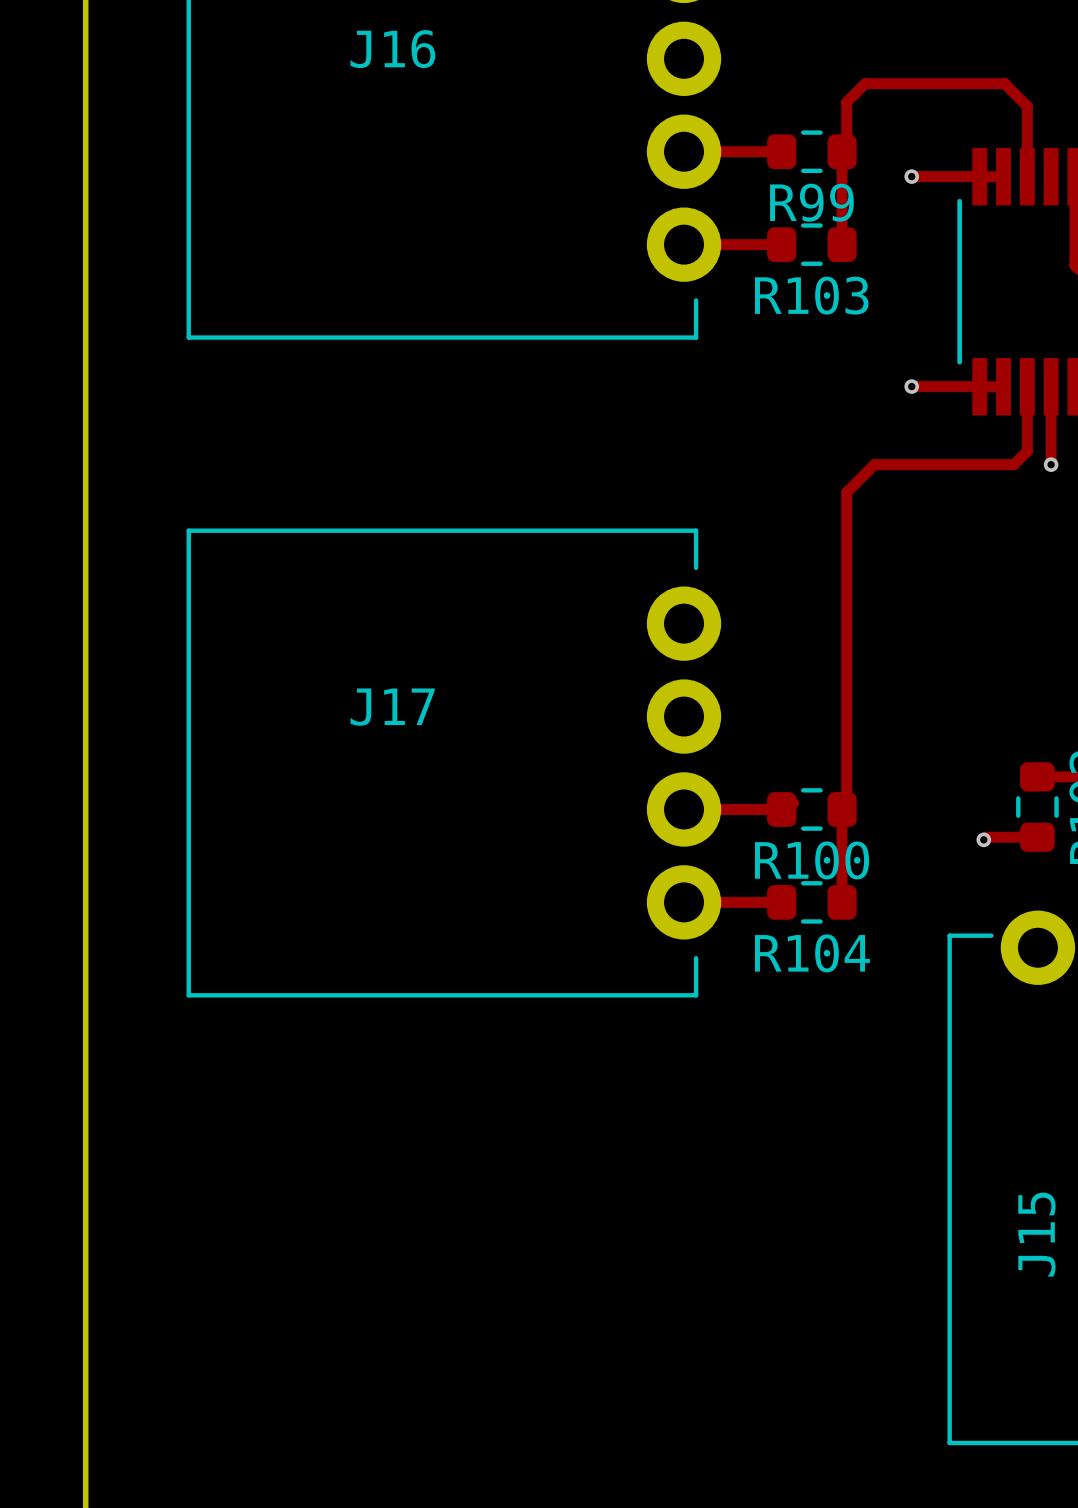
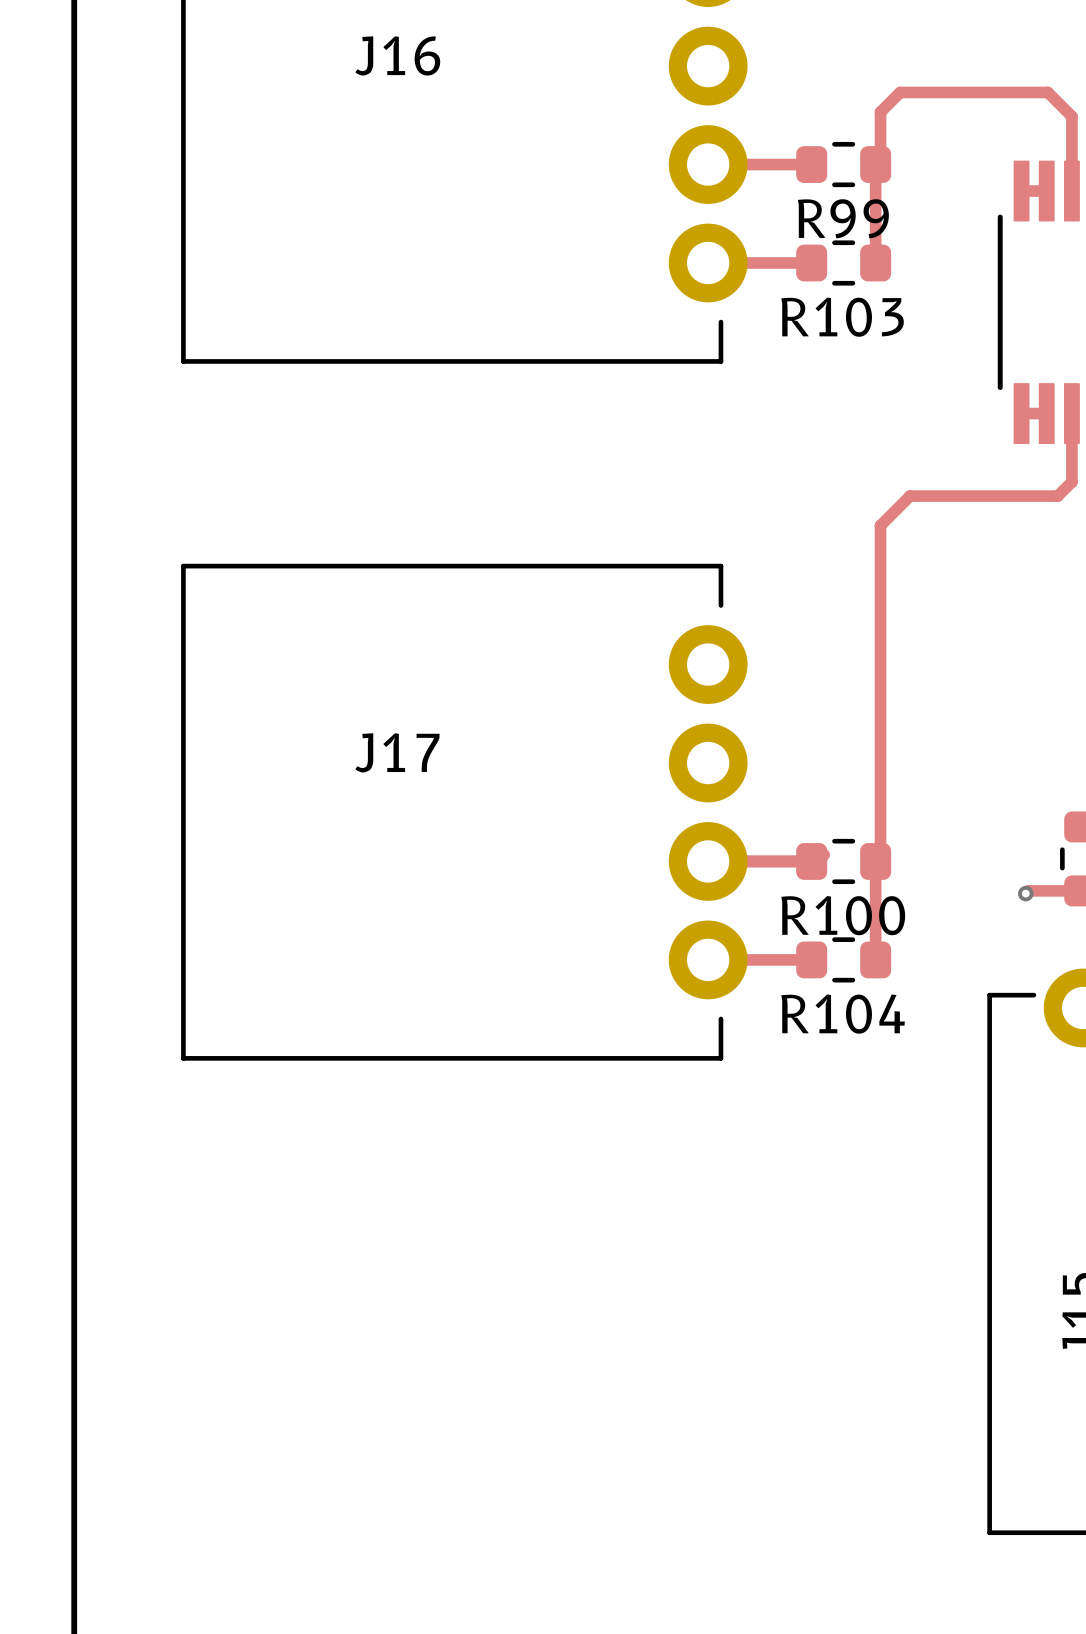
via: (911, 176) -> none
via: (911, 386) -> none

